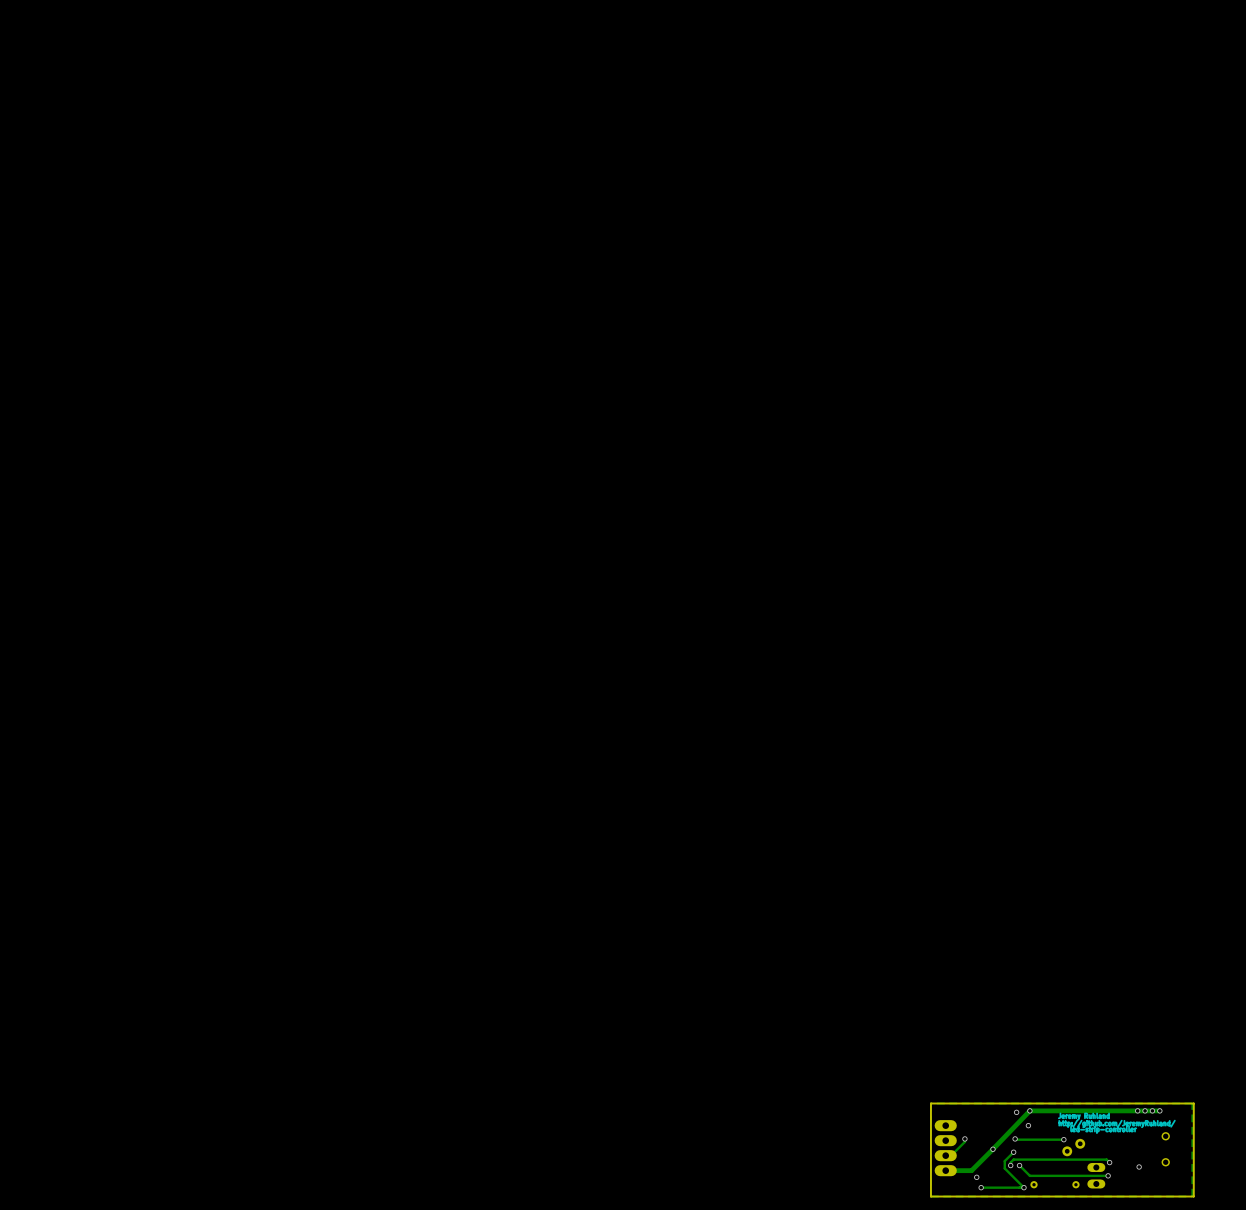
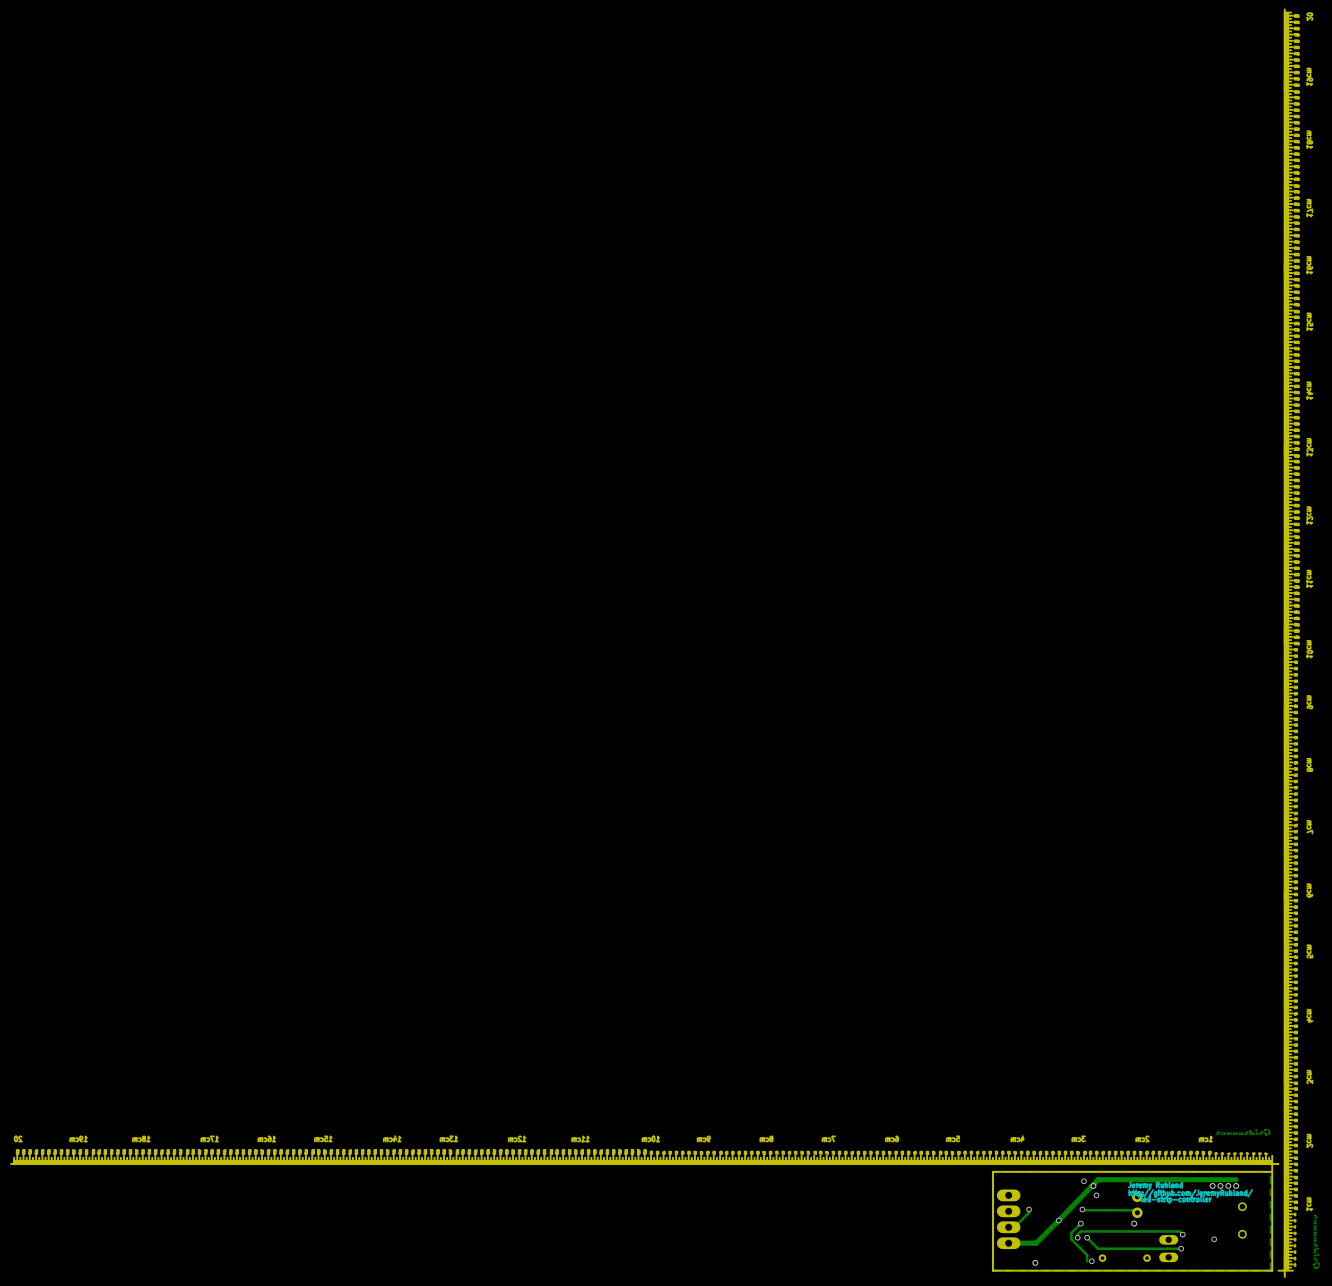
drawing: none -> [10, 9, 1320, 1277]
via: (1029, 1110) -> none
via: (1137, 1110) -> none
via: (1145, 1110) -> none
via: (1152, 1110) -> none
via: (1159, 1110) -> none
via: none -> (1093, 1185)
via: none -> (1212, 1185)
via: none -> (1220, 1185)
via: none -> (1228, 1185)
via: none -> (1236, 1185)
part: none -> (1137, 1204)
via: (1063, 1139) -> none
part: (1073, 1147) -> none
via: none -> (1134, 1223)
track: (1004, 1166) (1023, 1187) (981, 1187) -> (1071, 1239) (1087, 1254) (1087, 1261)
via: (976, 1177) -> none
via: (981, 1187) -> none
via: none -> (1035, 1262)

